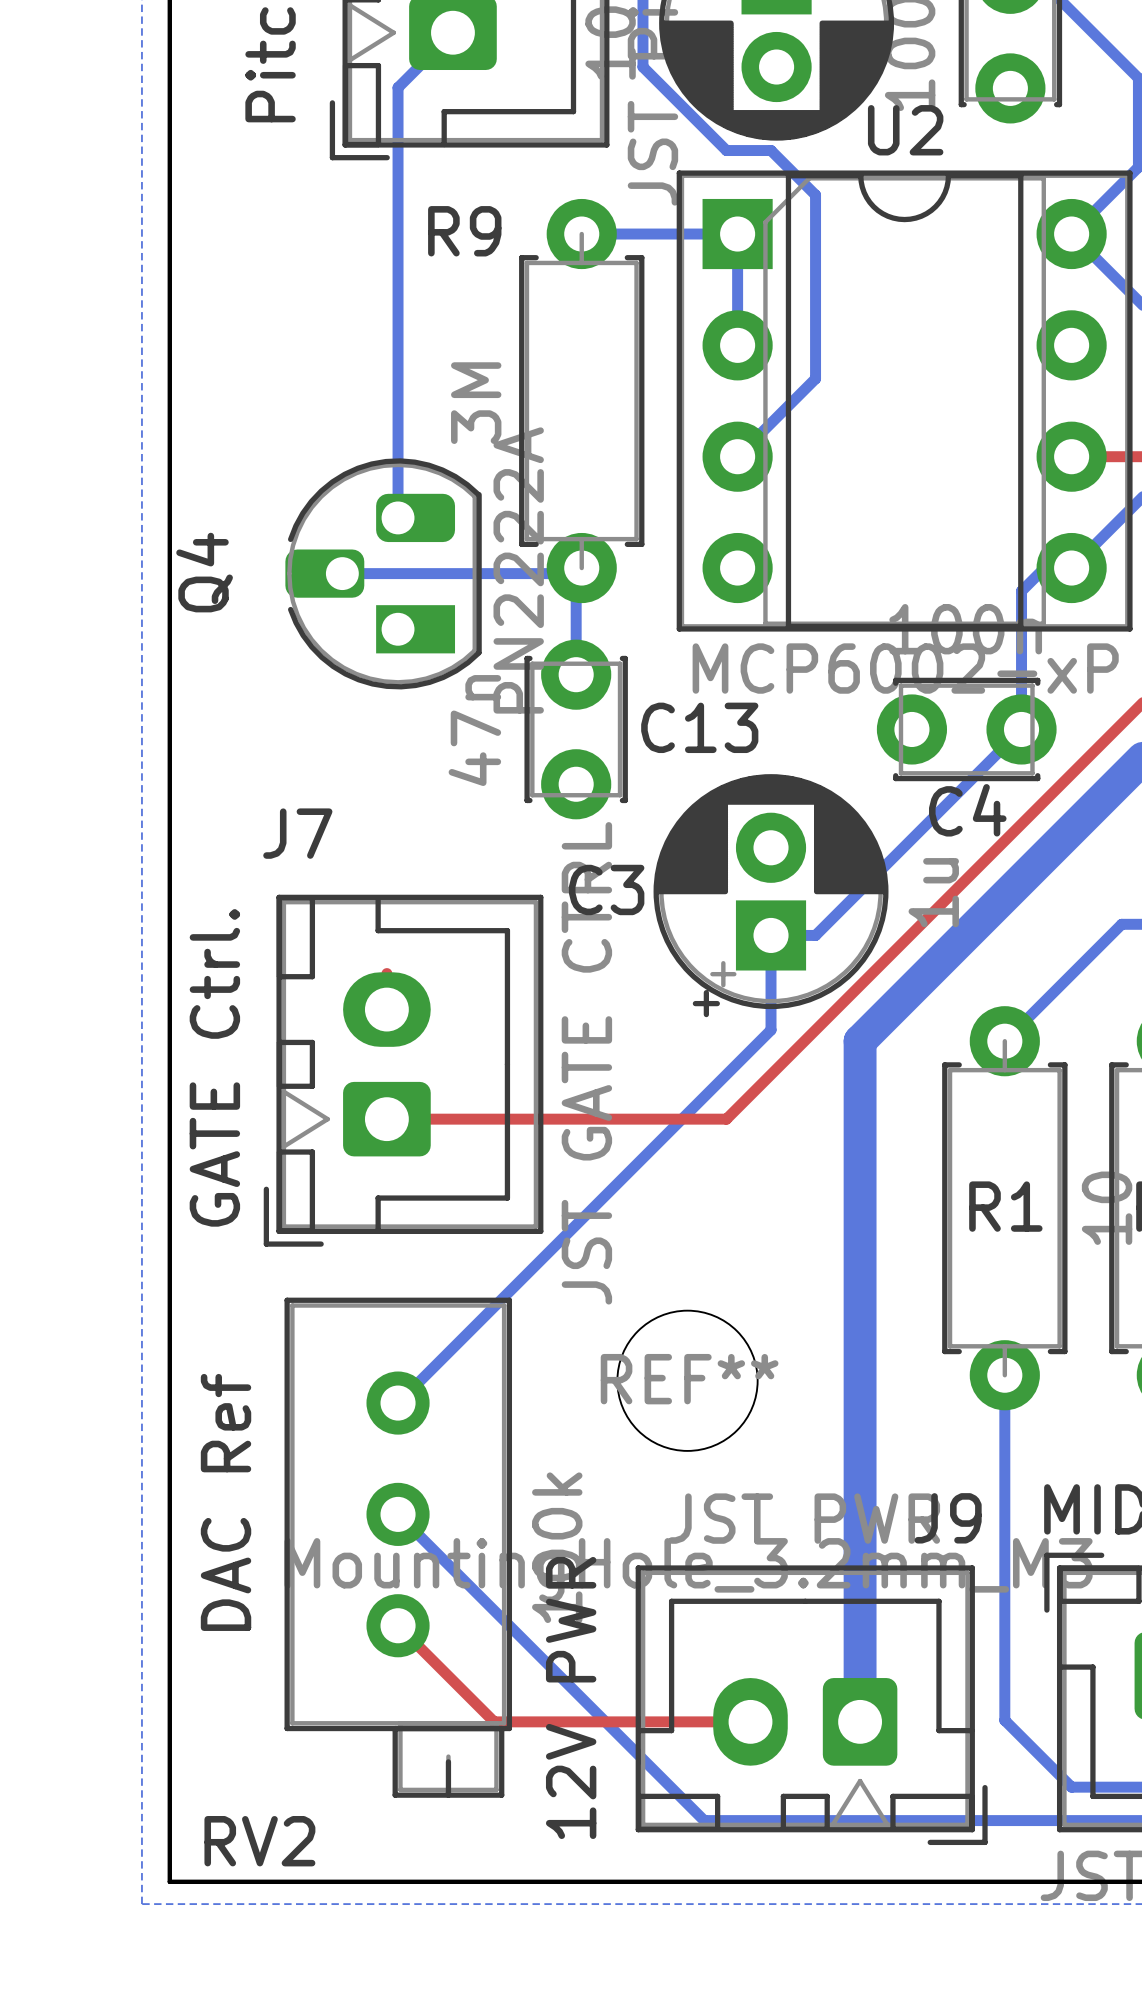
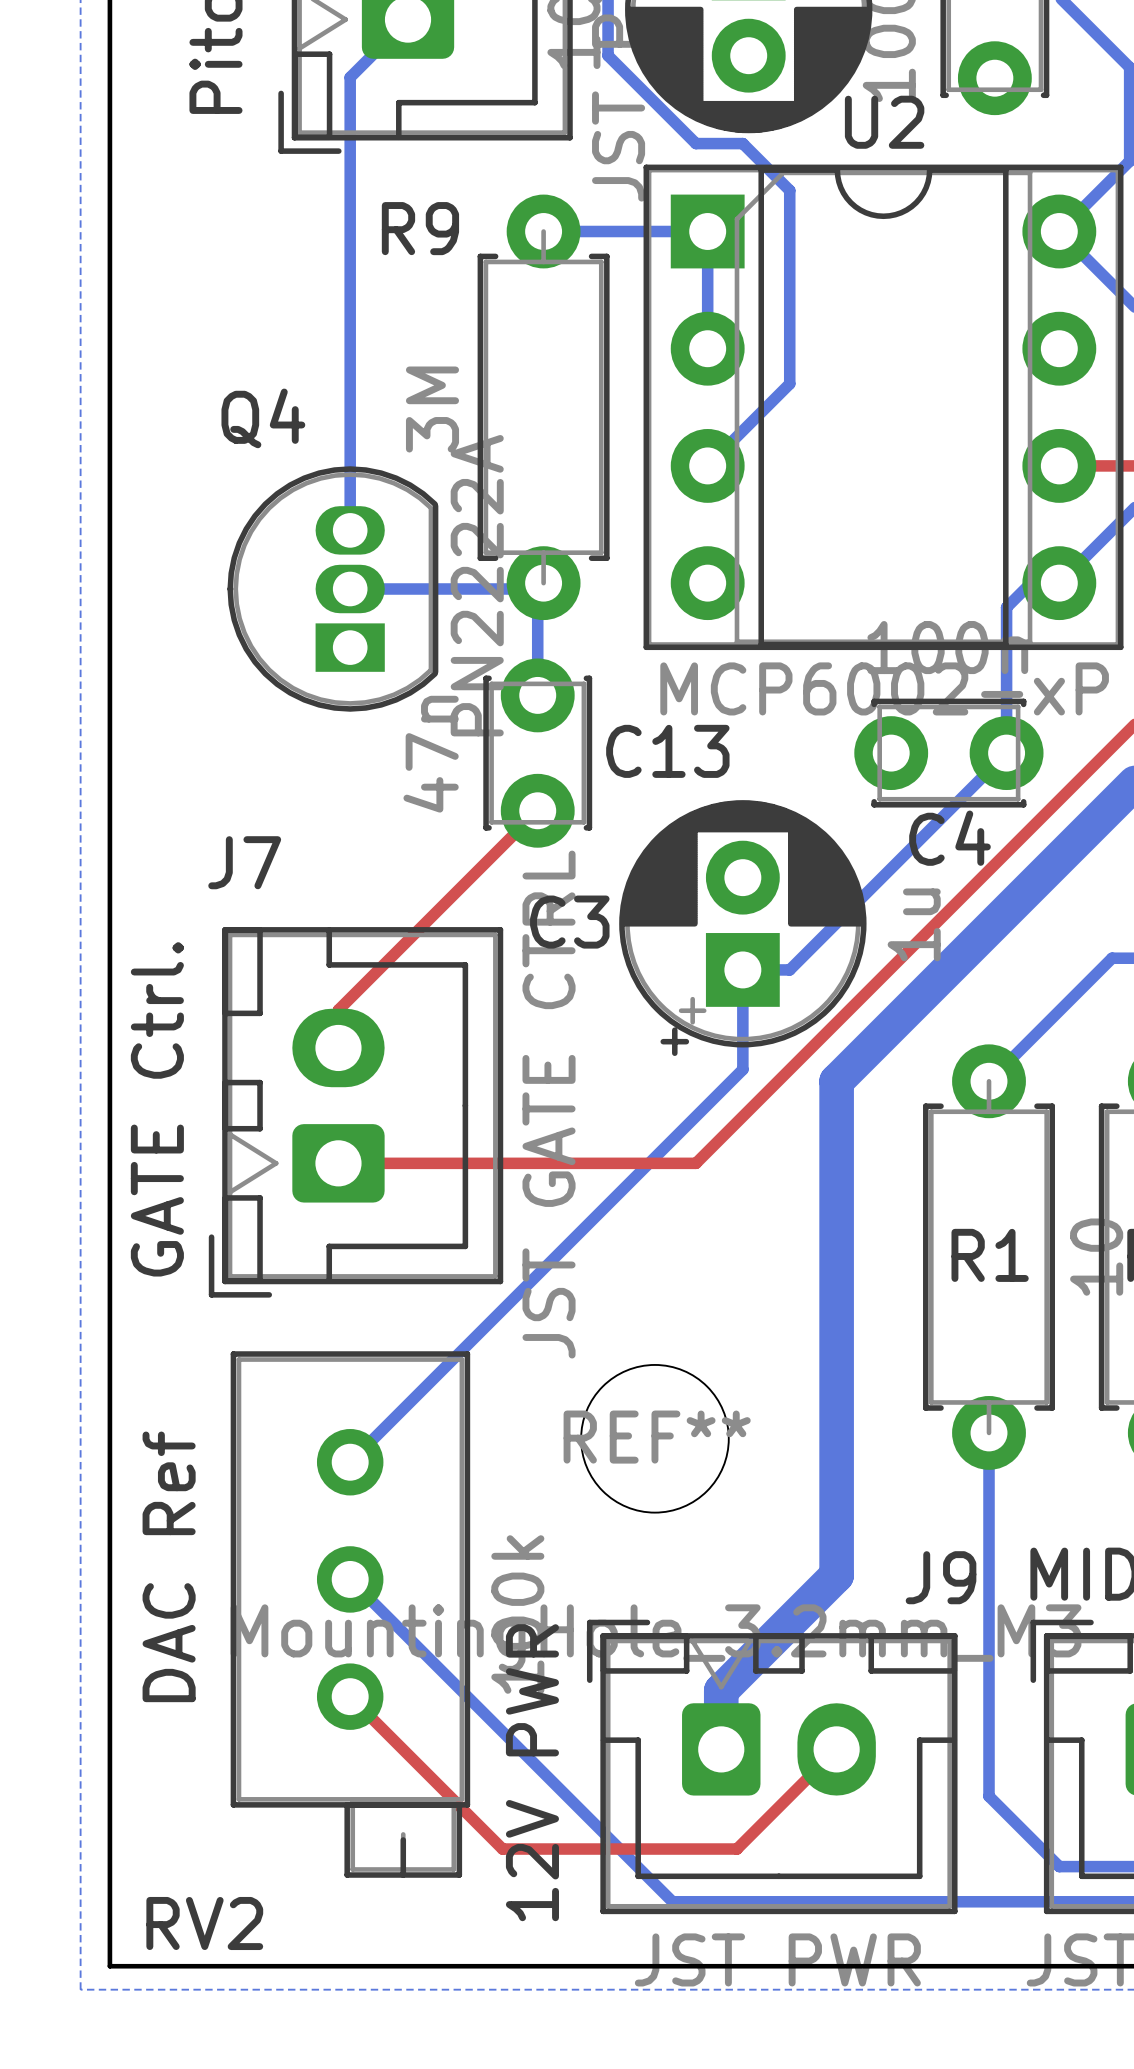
Q4 footprint: [285, 458, 482, 690] -> [227, 466, 439, 712]
Q4 name position: Q4 (204, 572) -> Q4 (263, 418)
bottom track: (342, 573) (398, 573) -> none
top track: none -> (537, 810) (338, 1010)
bottom track: (860, 1510) (860, 1721) -> (836, 1575) (721, 1690) (721, 1749)
J9 rotation: 0° (811, 1705) -> 180° (772, 1766)
top track: (494, 1721) (750, 1721) -> (451, 1797) (502, 1849) (736, 1849) (836, 1749)

